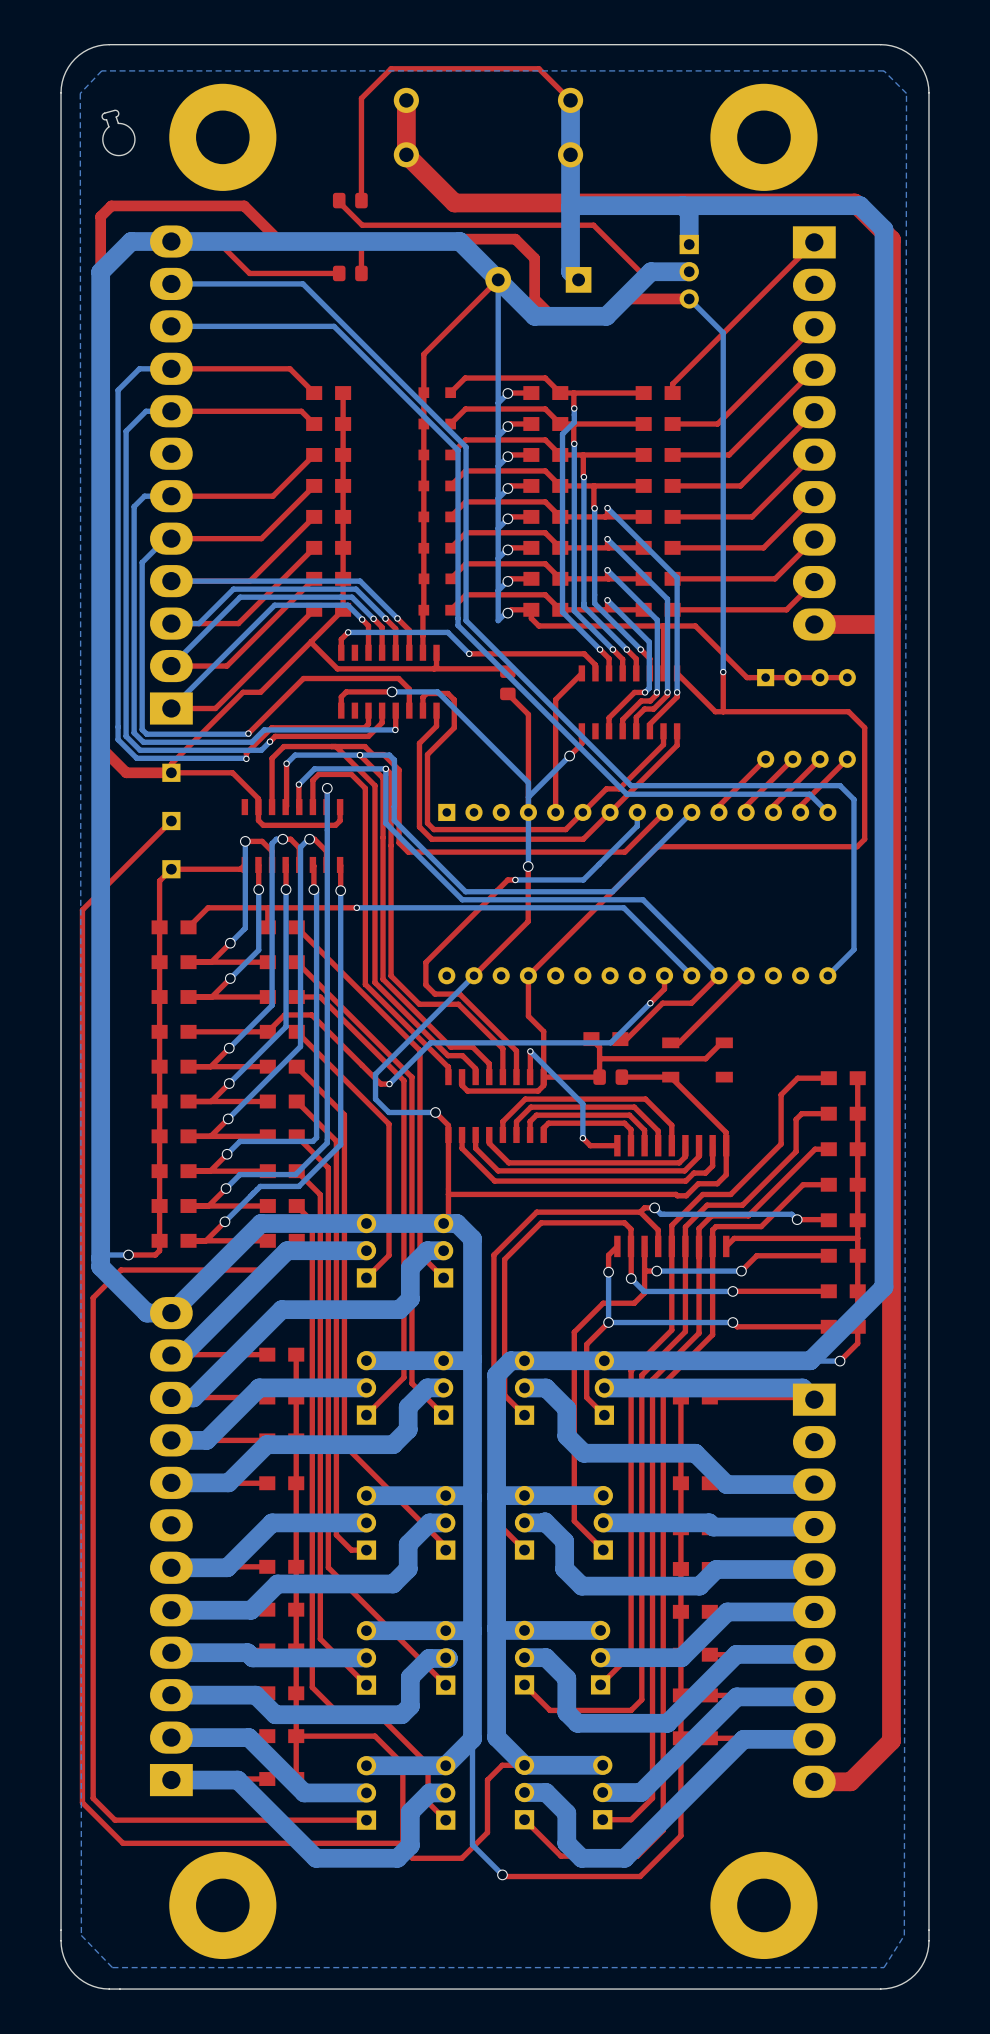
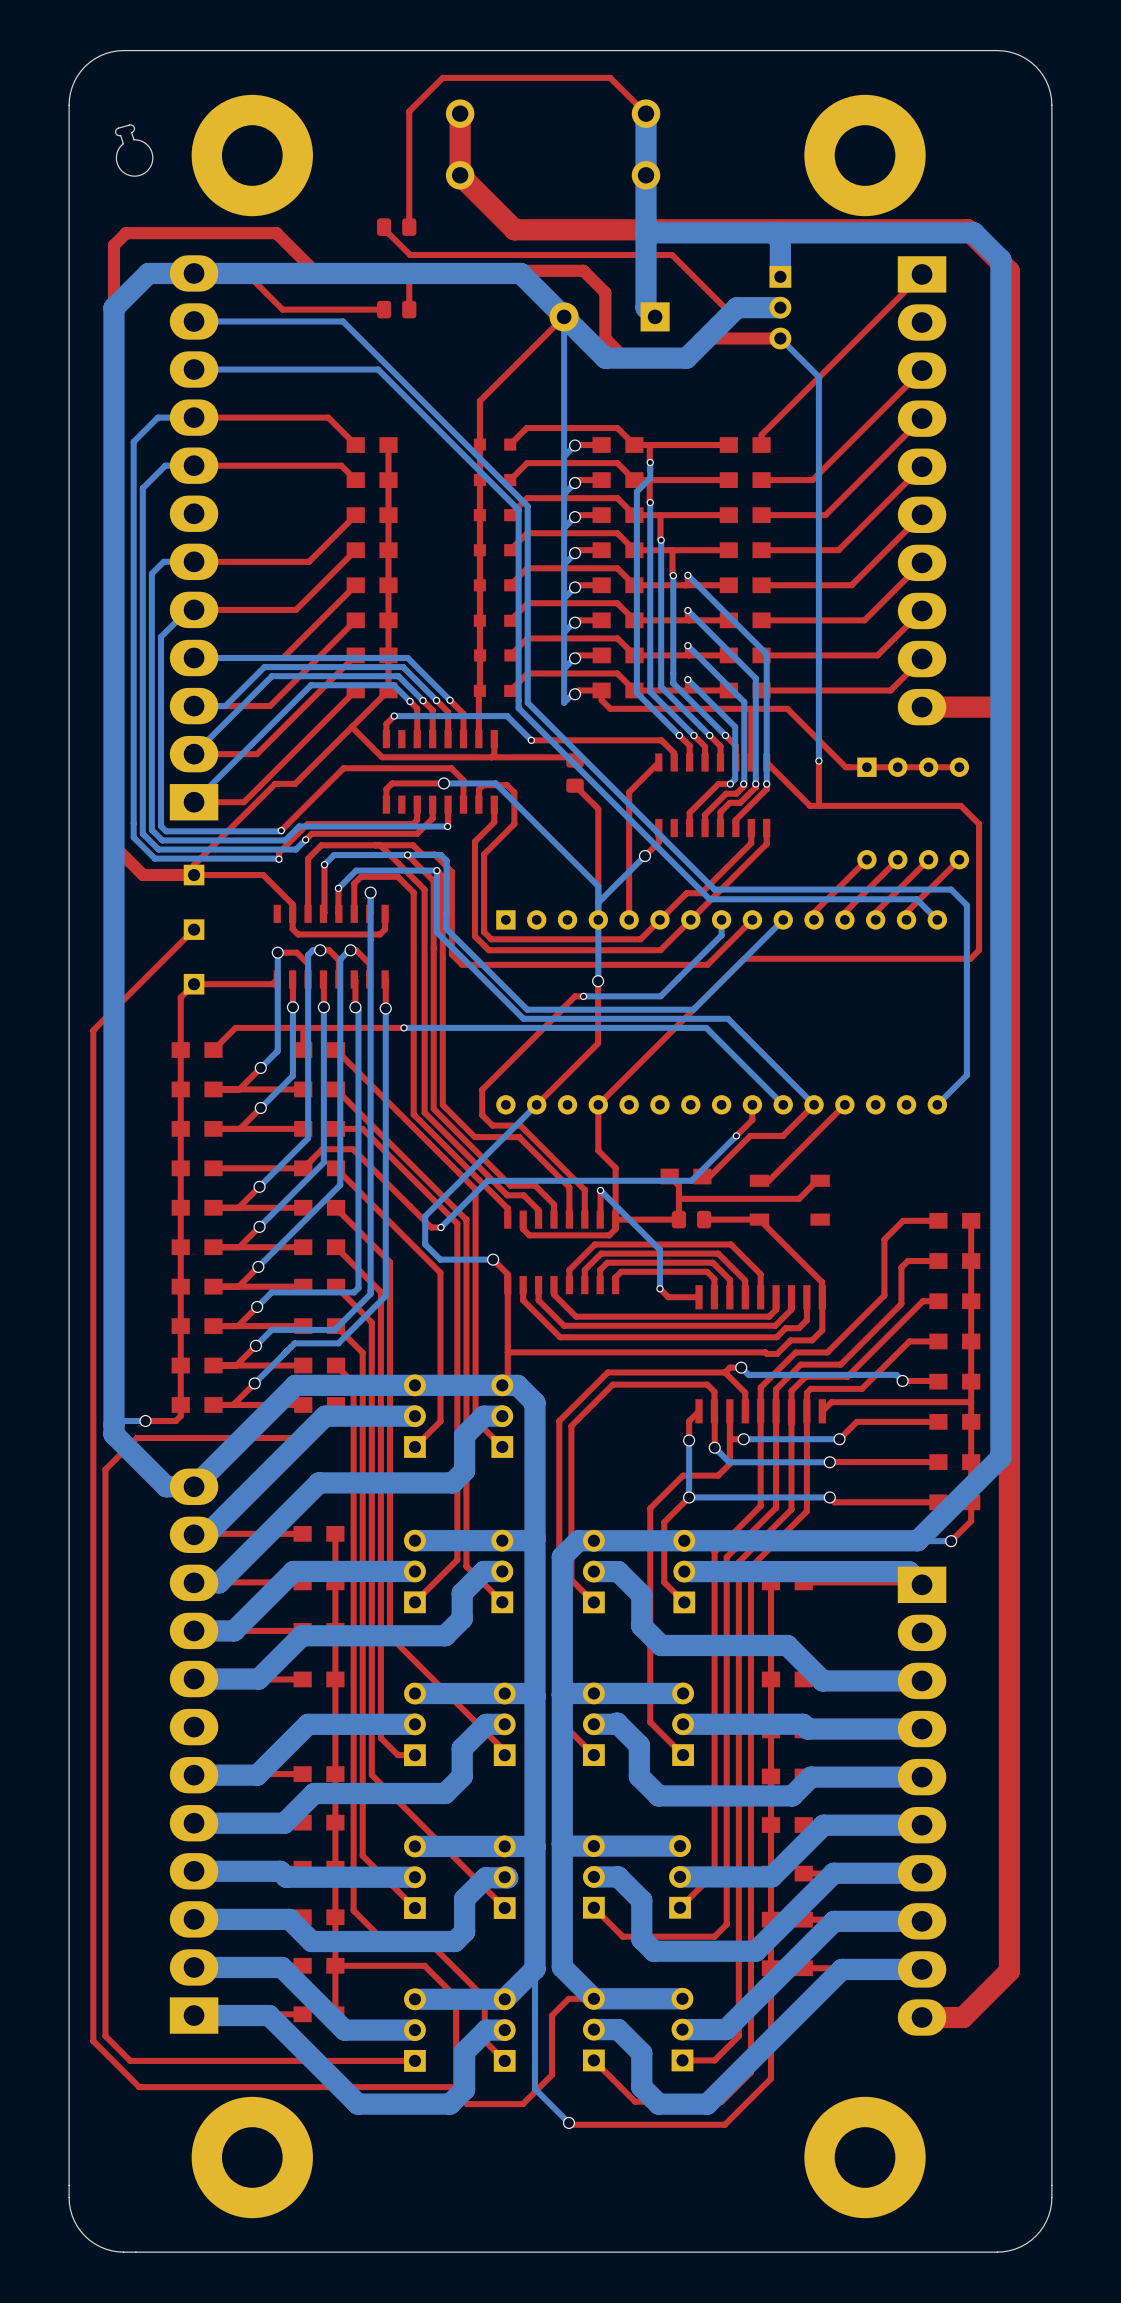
bottom zone outline: (883, 70) (906, 93) (904, 1935) (883, 1967) (112, 1967) (81, 1935) (80, 93) (101, 70) (883, 70) -> none

